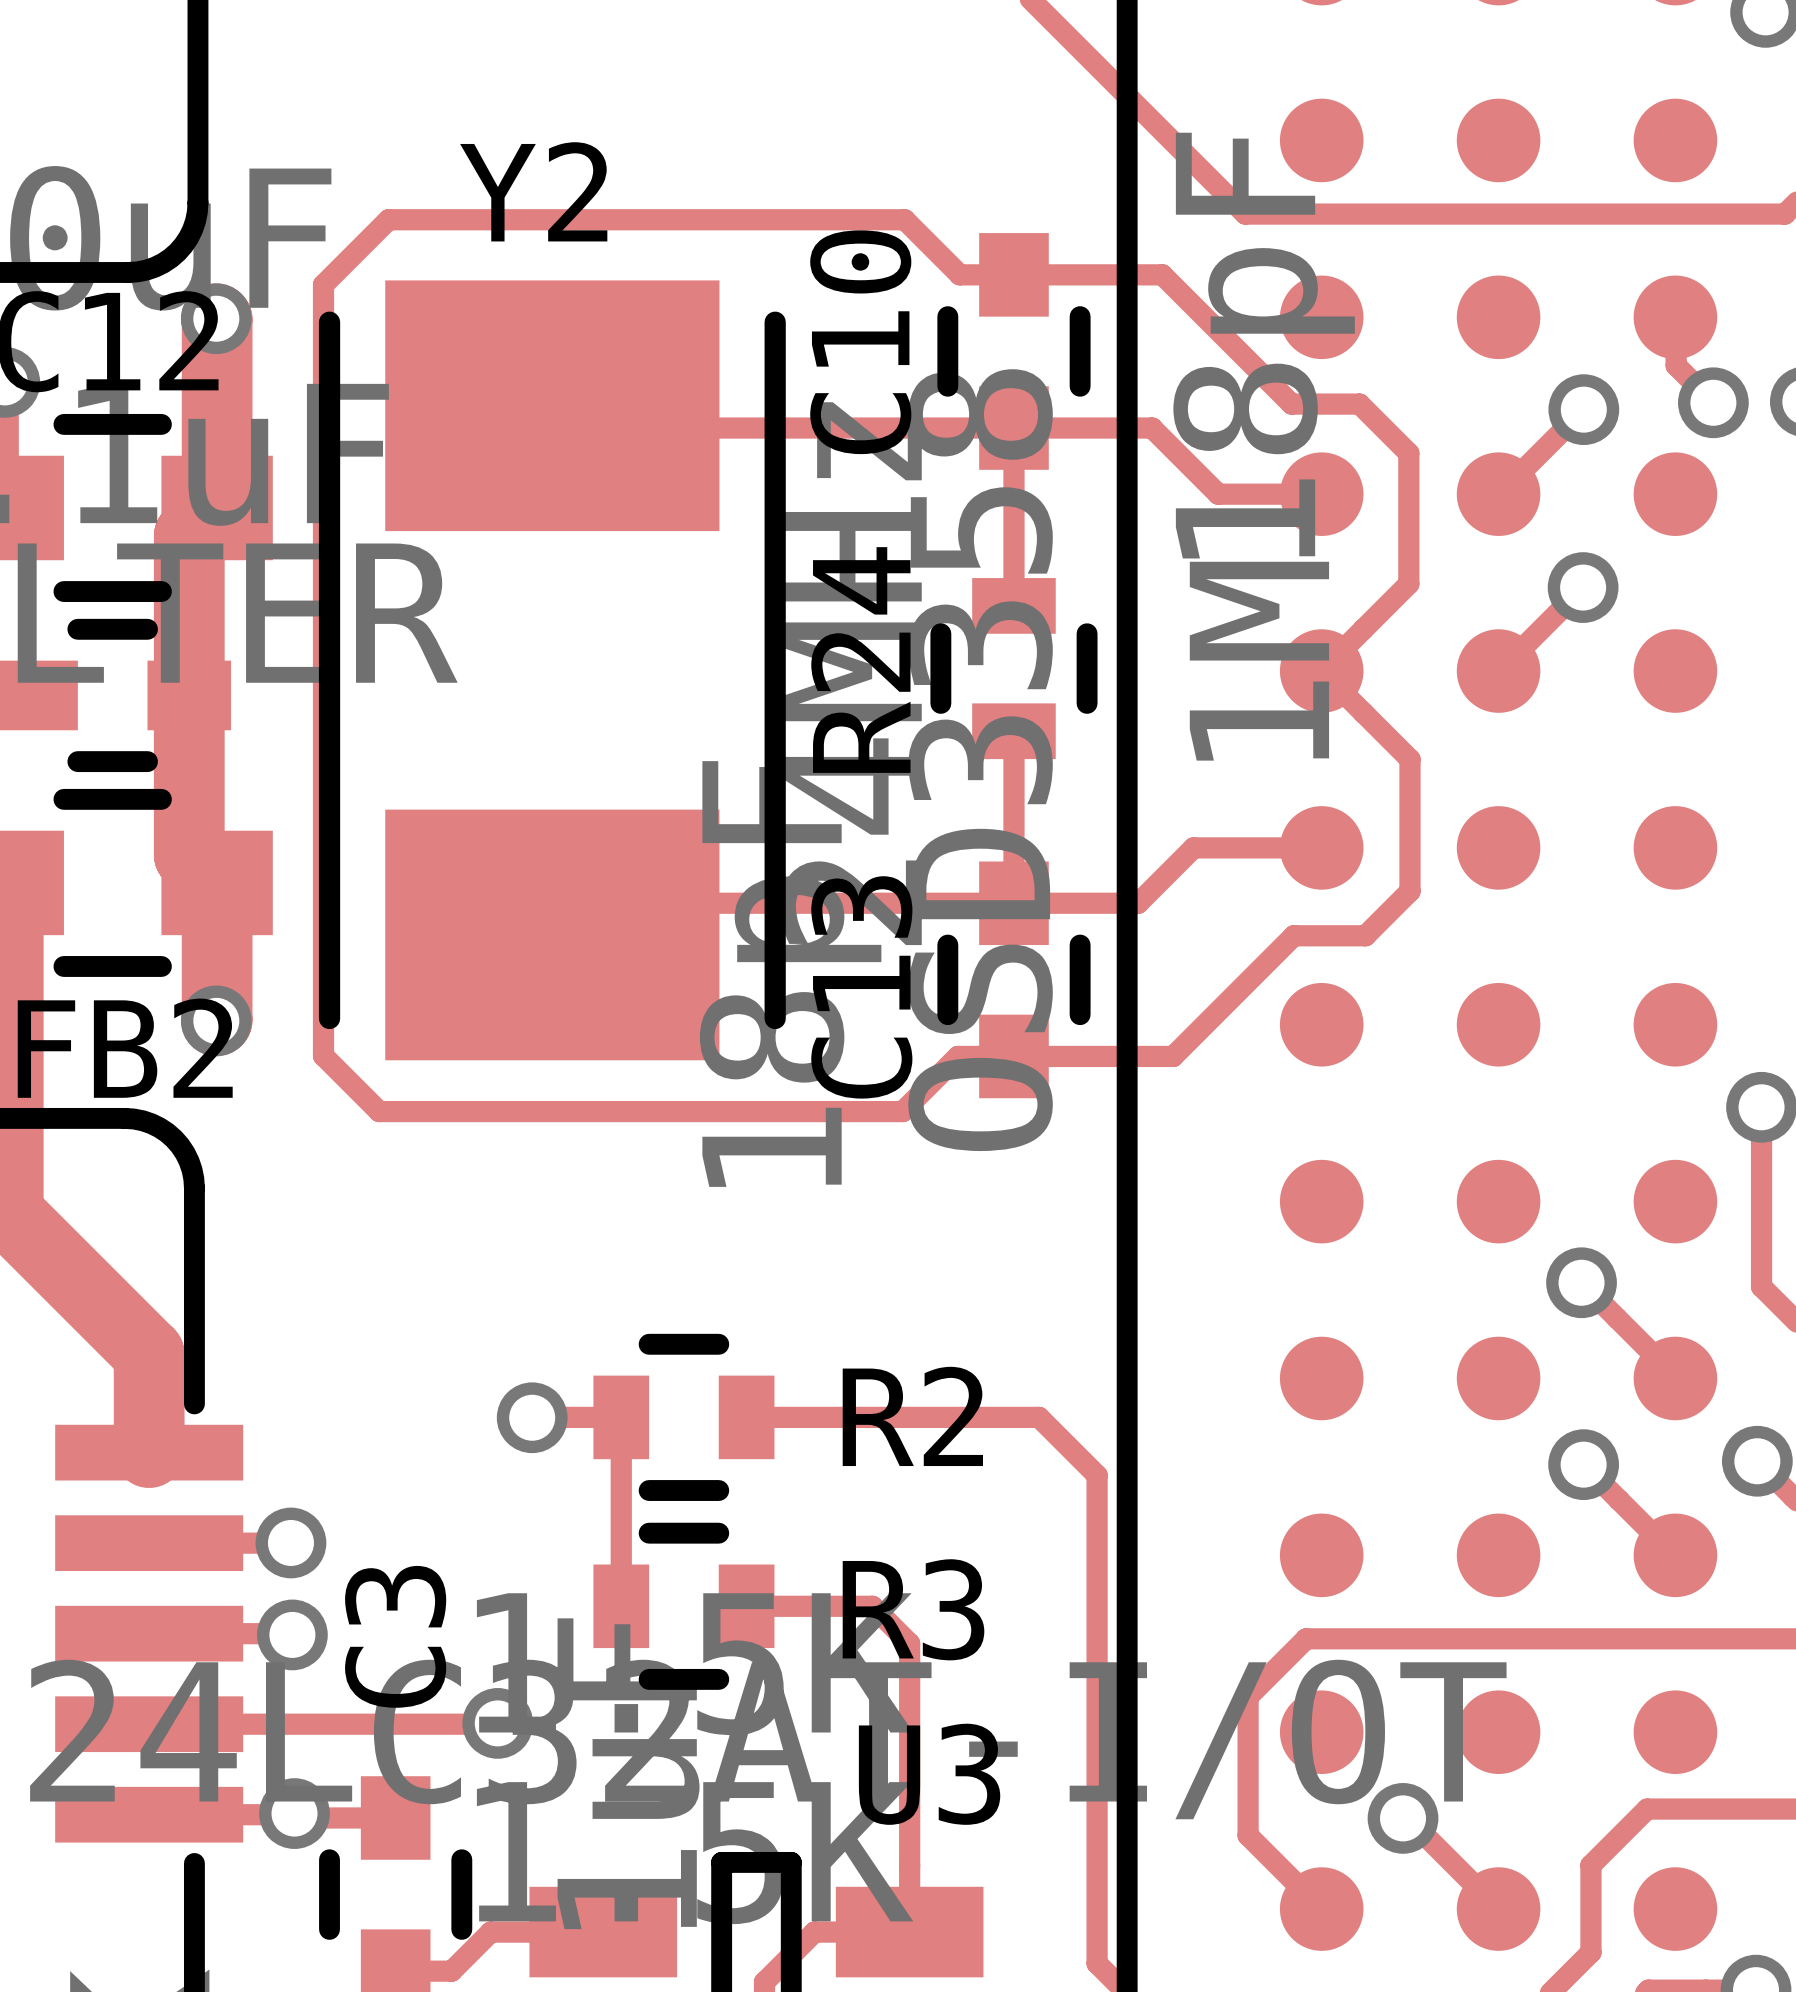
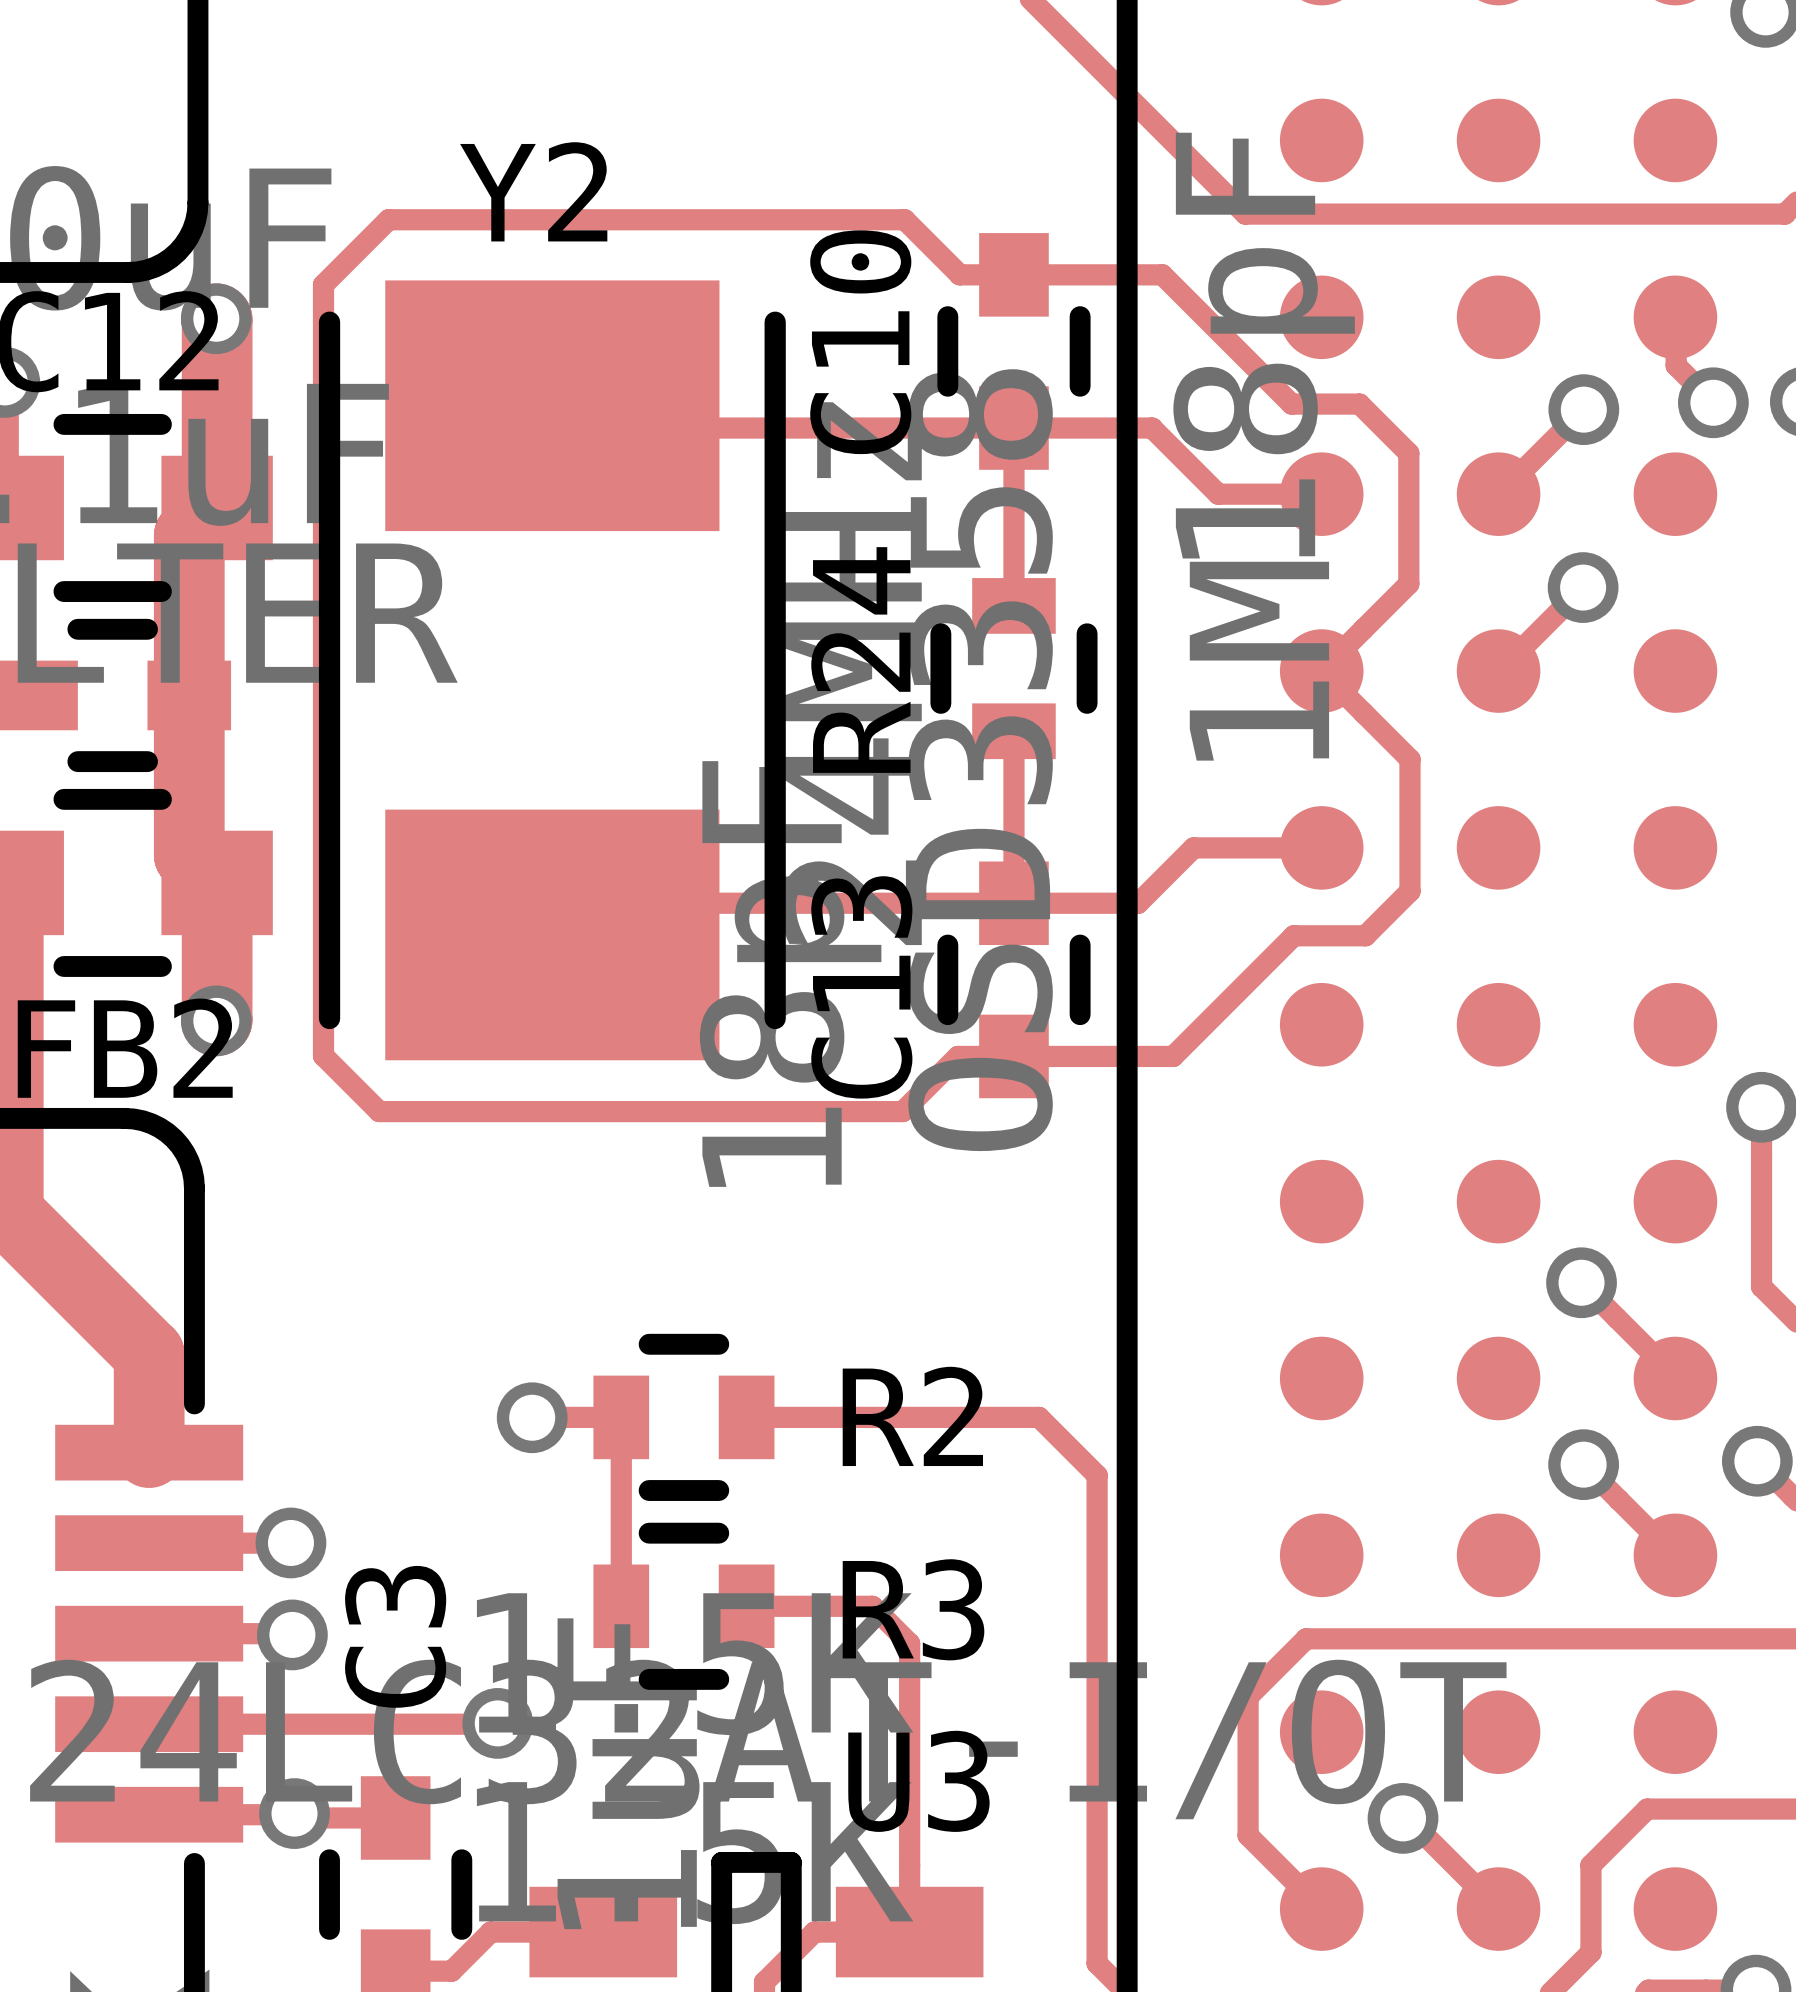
U3 name position: U3 (929, 1774) -> U3 (918, 1781)

